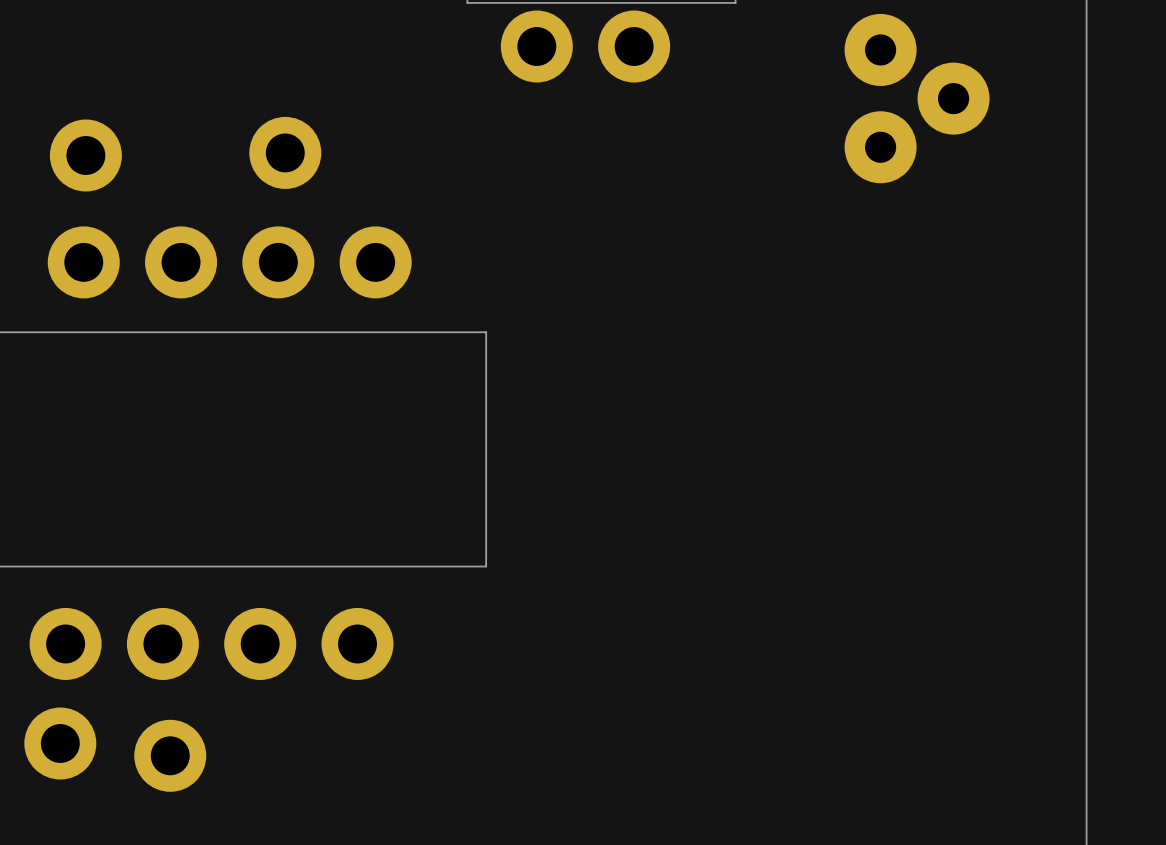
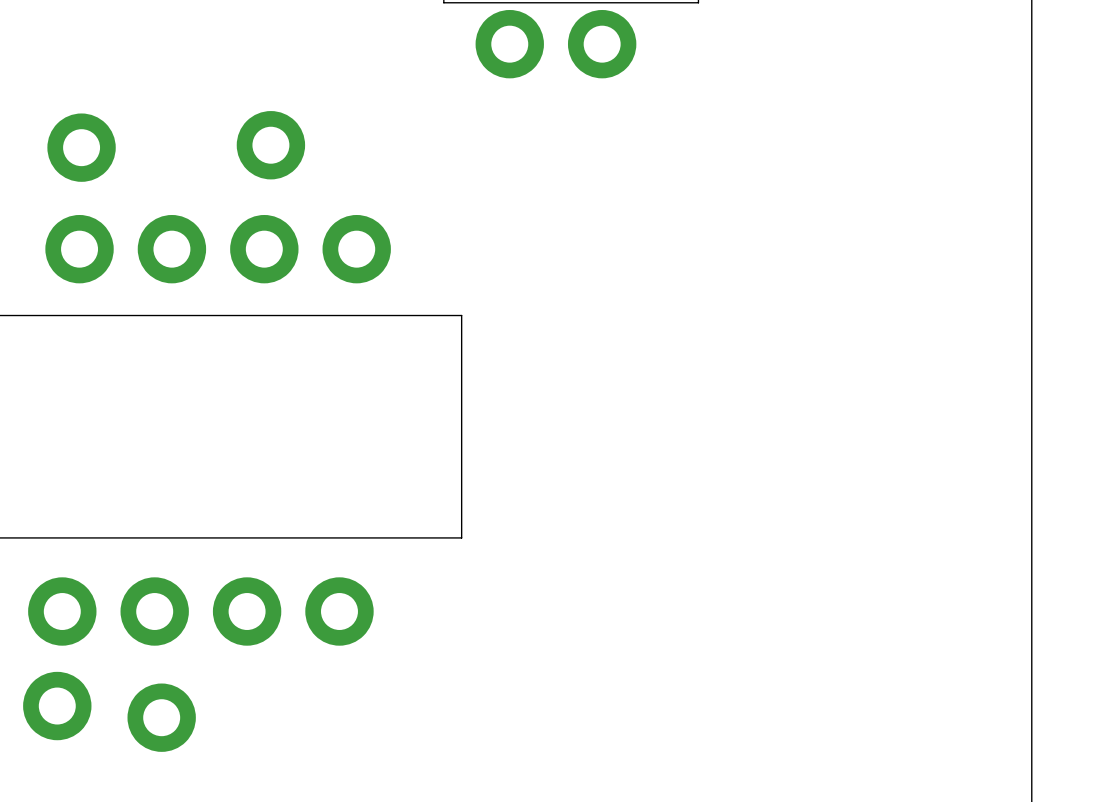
part: (917, 98) -> none

